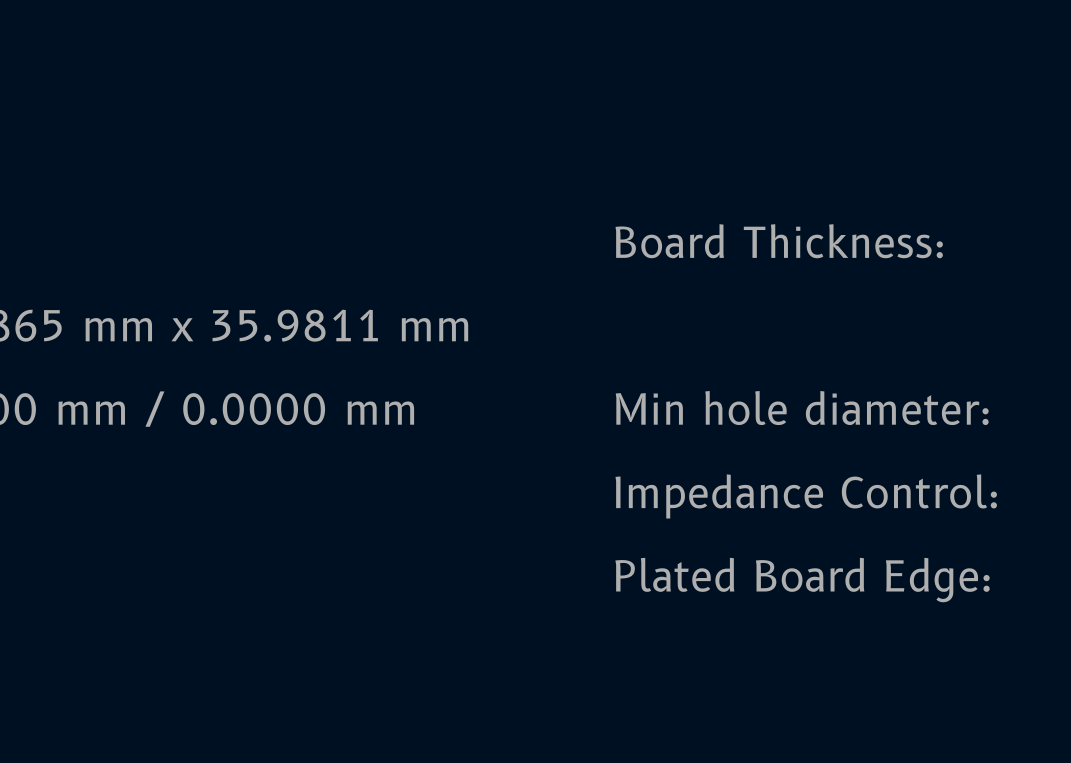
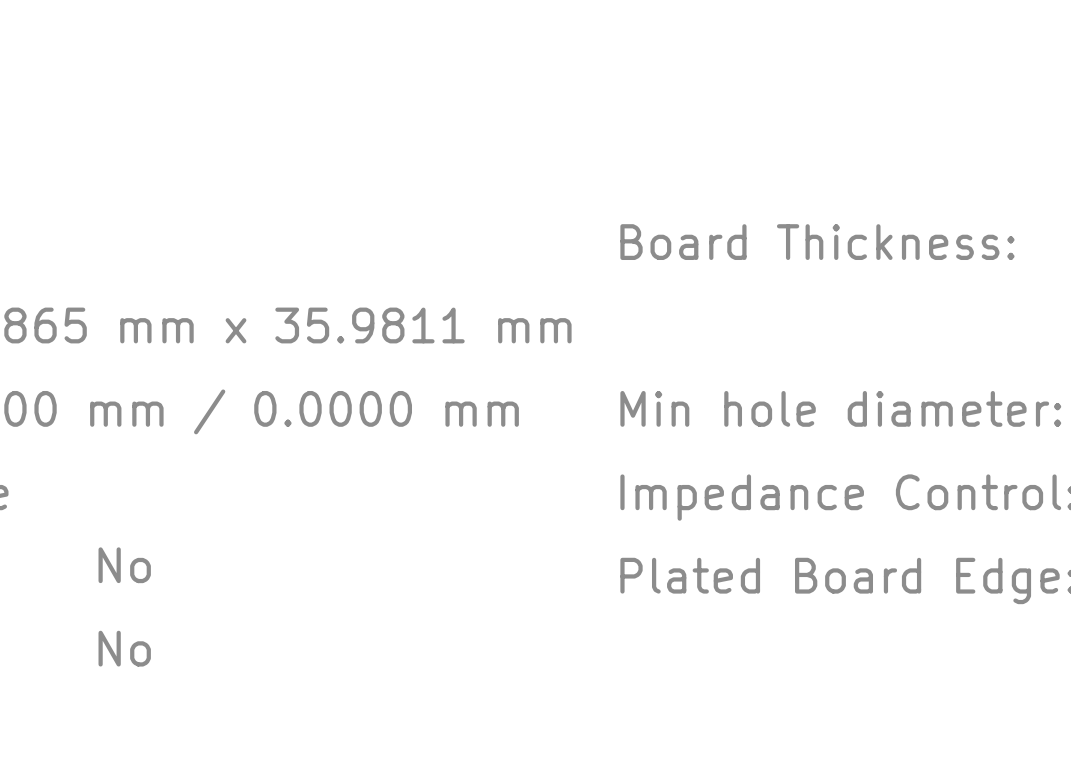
text: none -> No (124, 565)
text: none -> No (124, 648)

